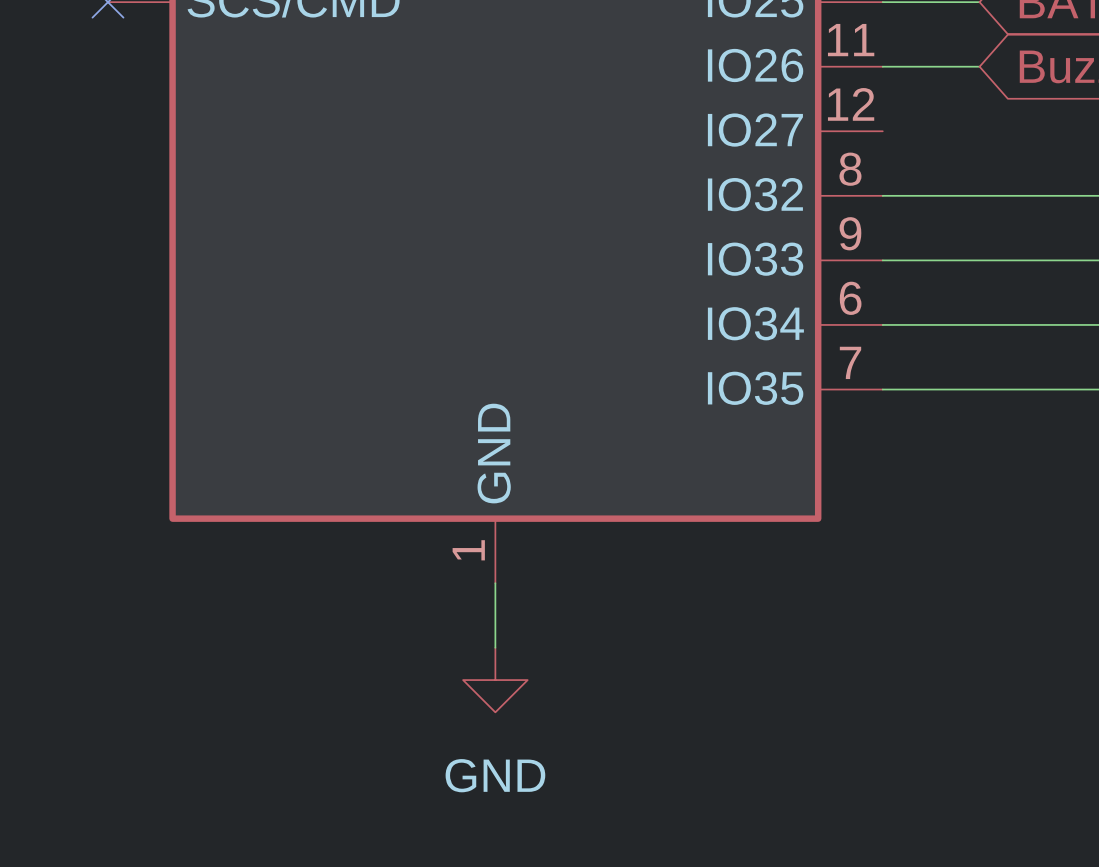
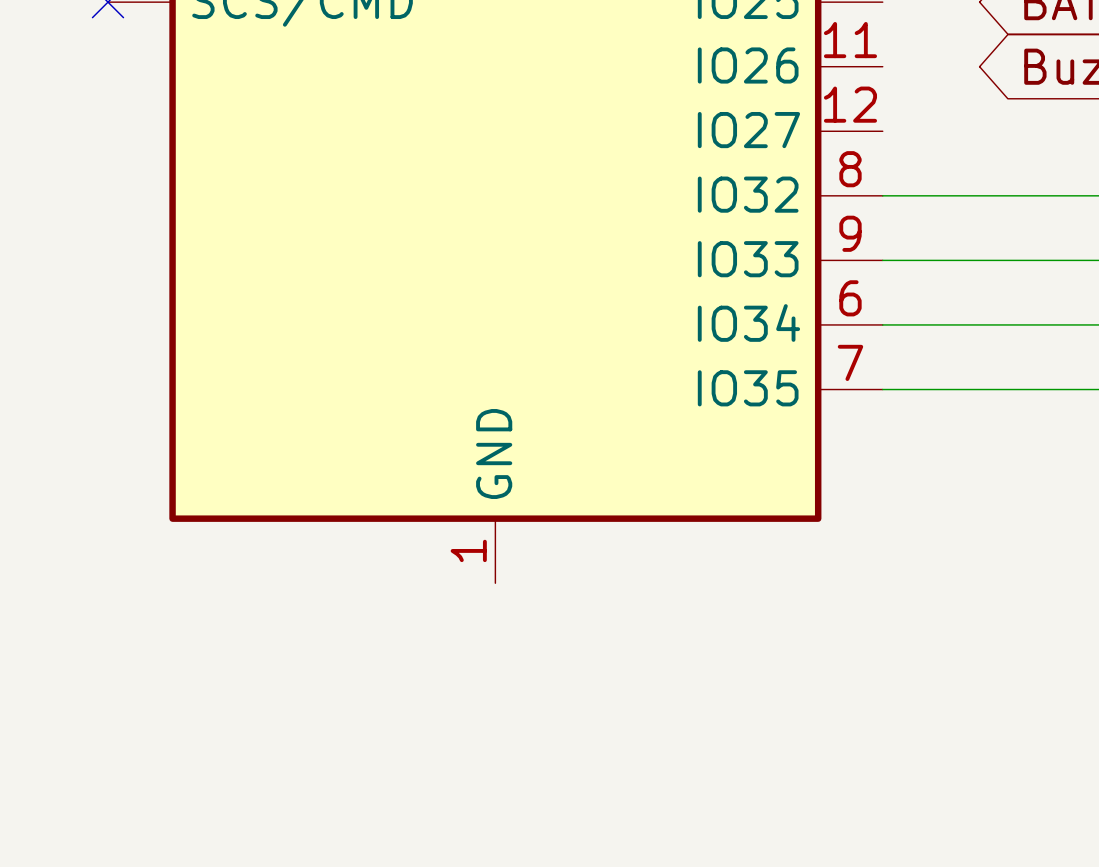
wire: (882, 2) (979, 2) -> none
wire: (882, 66) (979, 66) -> none
wire: (495, 583) (495, 647) -> none
power symbol: GND (495, 680) -> none

